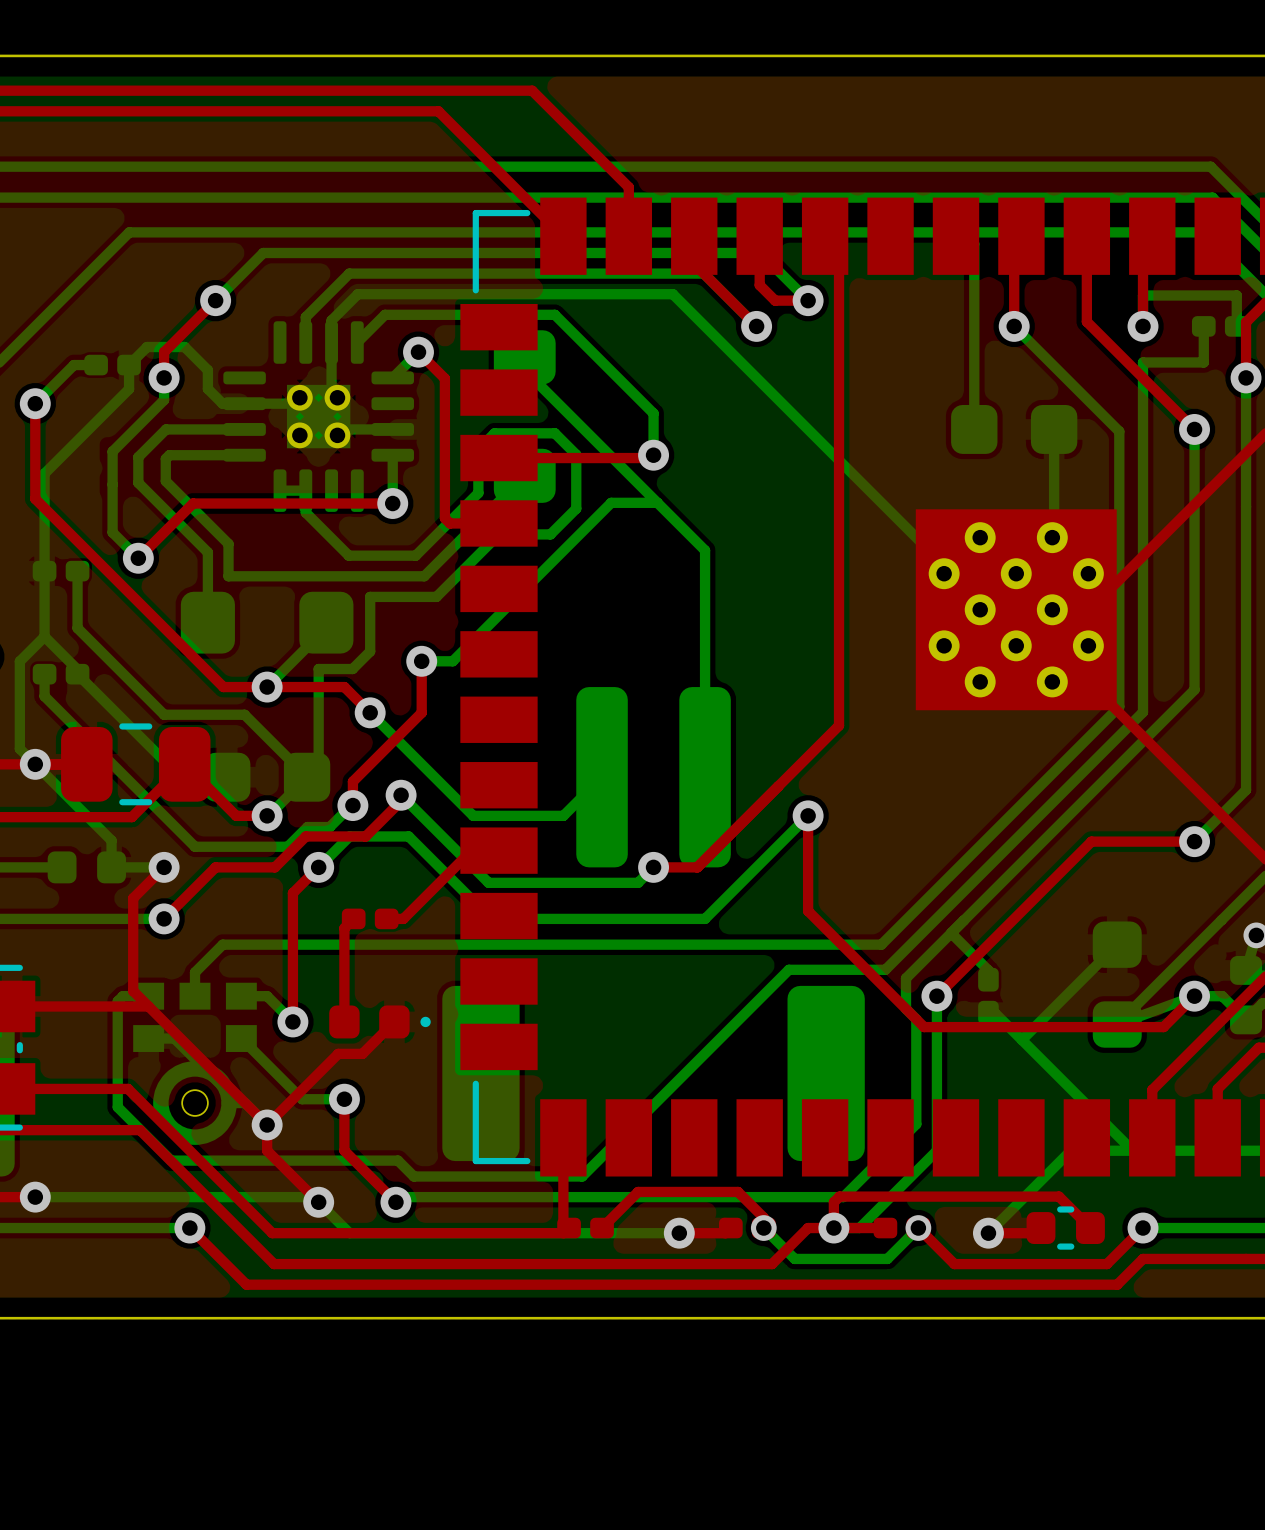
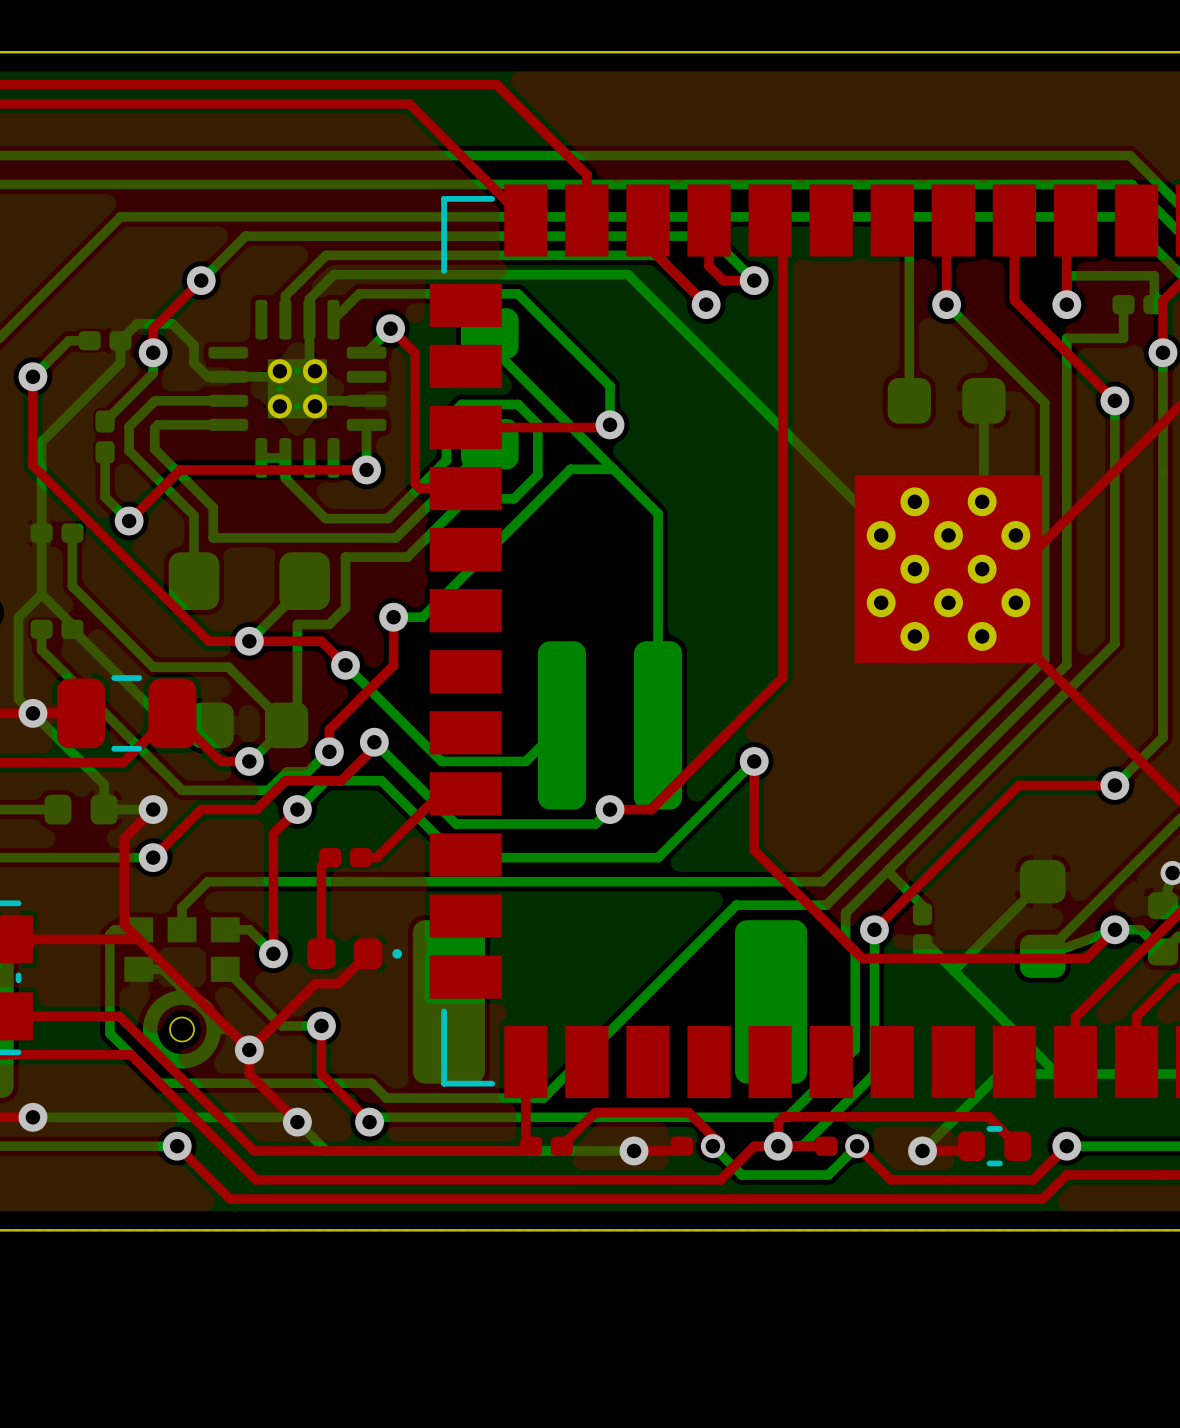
bottom track: (112, 451) (112, 484) -> none
part: none -> (105, 436)

